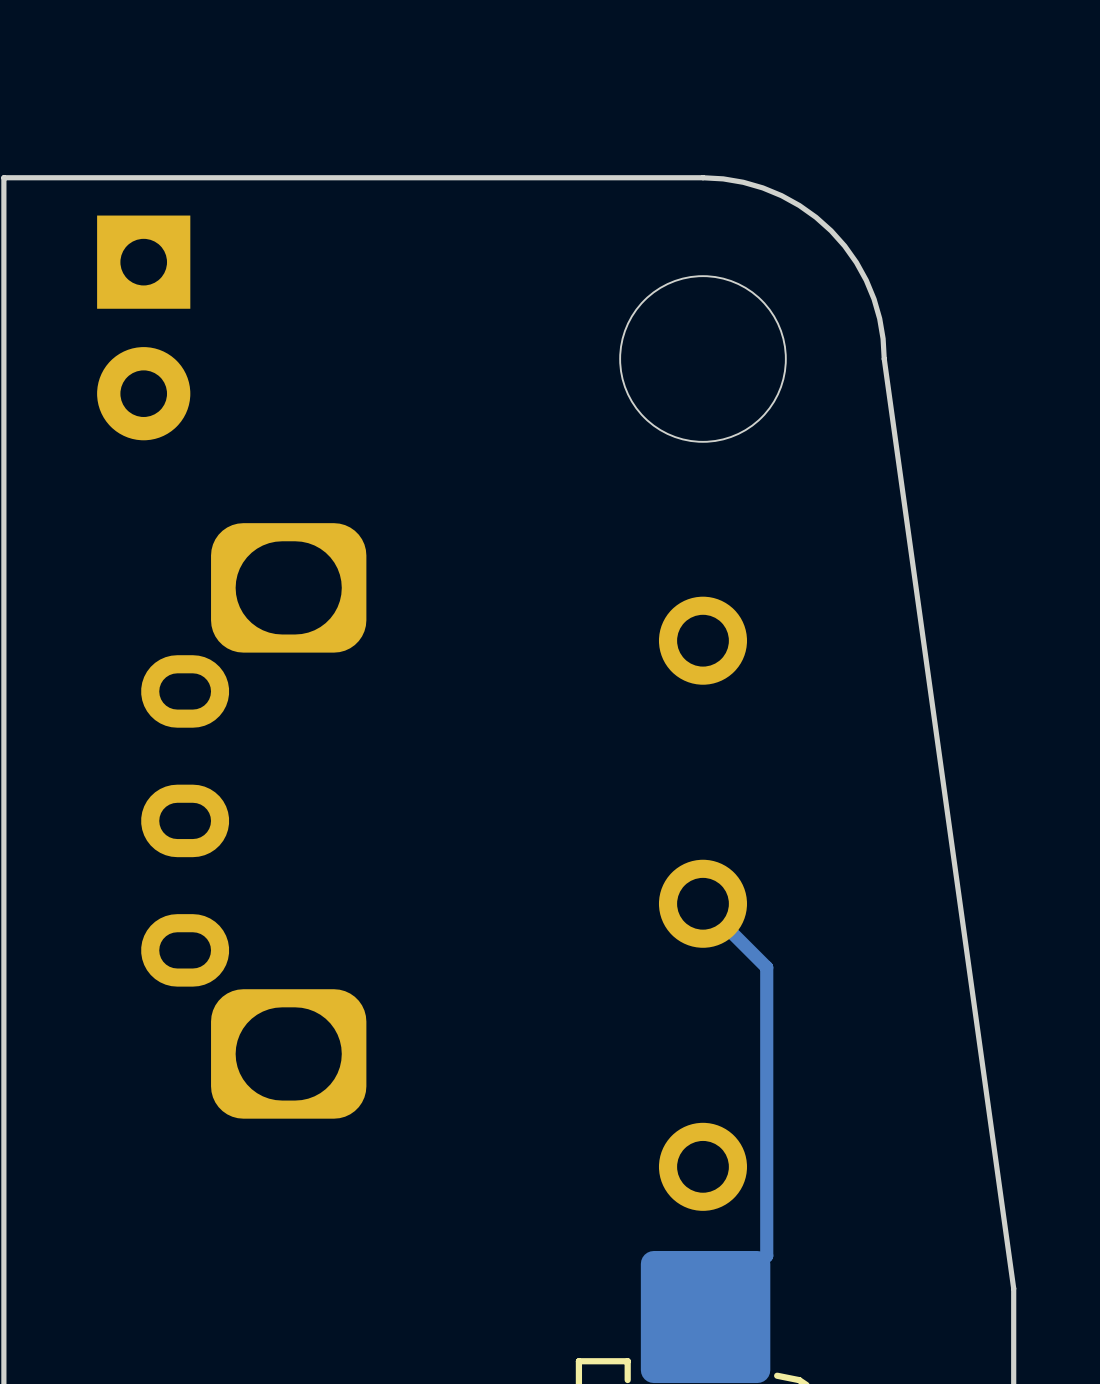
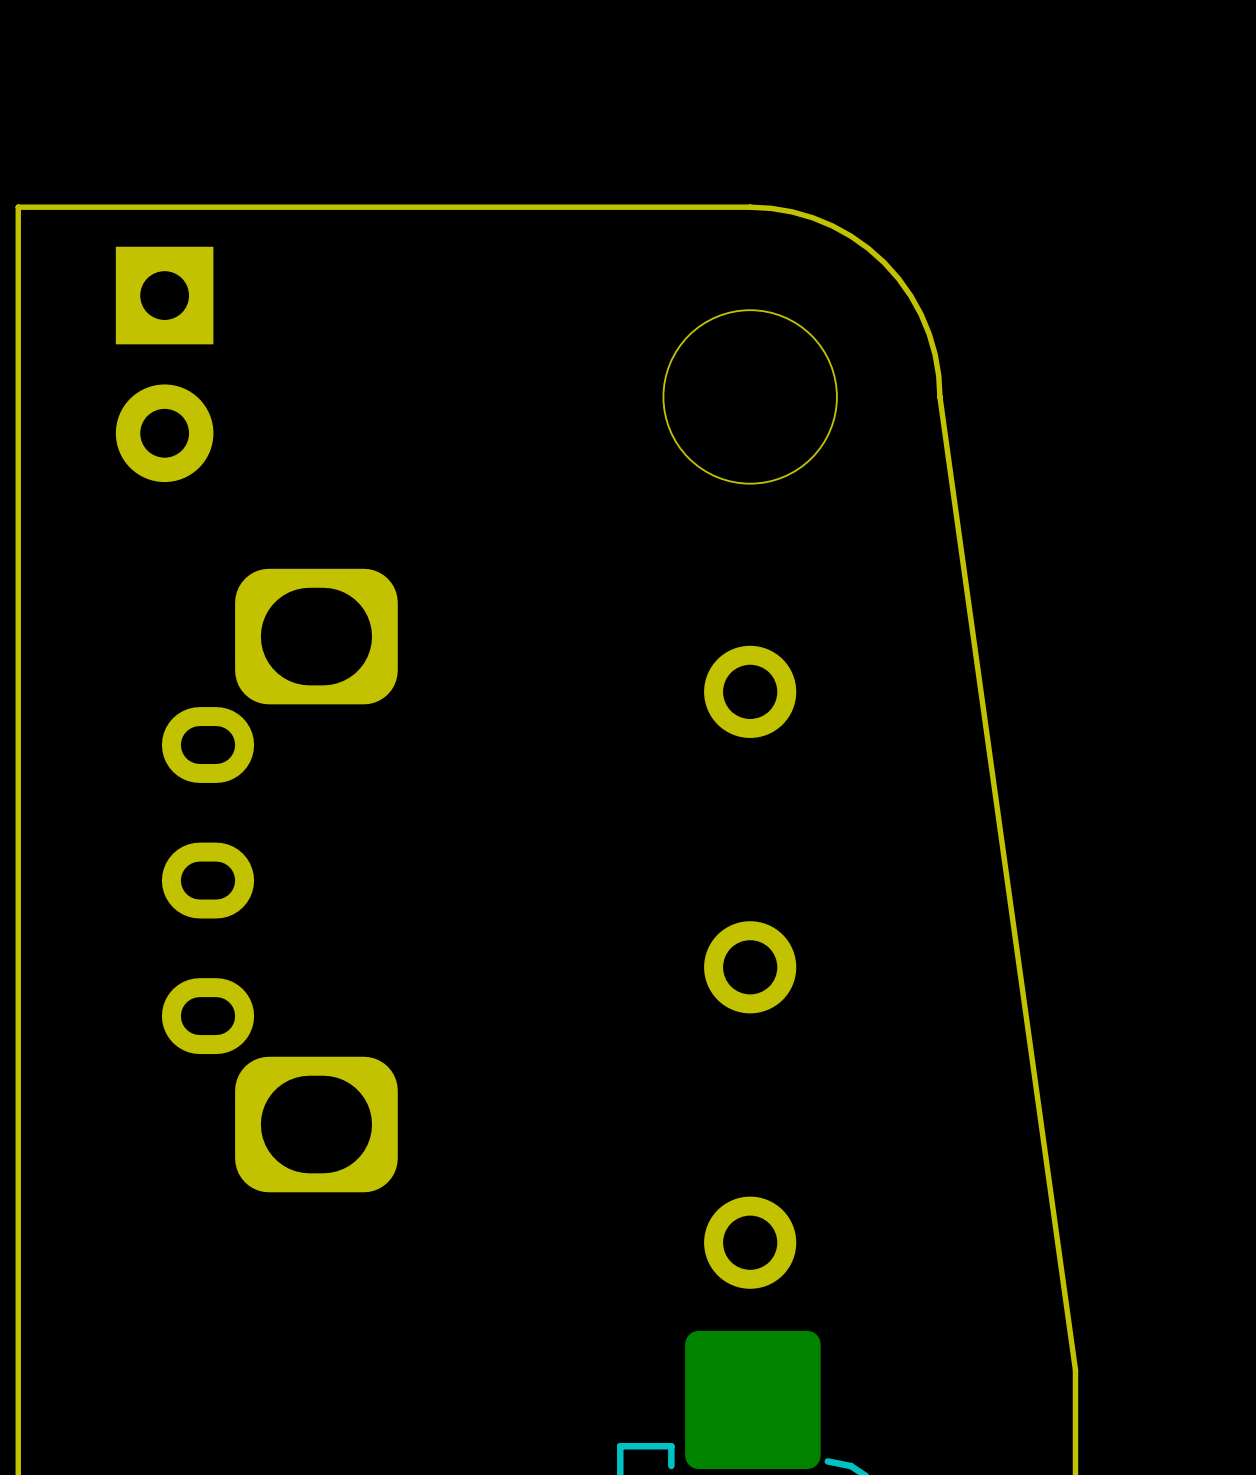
track: (702, 903) (766, 967) (766, 1255) (705, 1317) -> none

